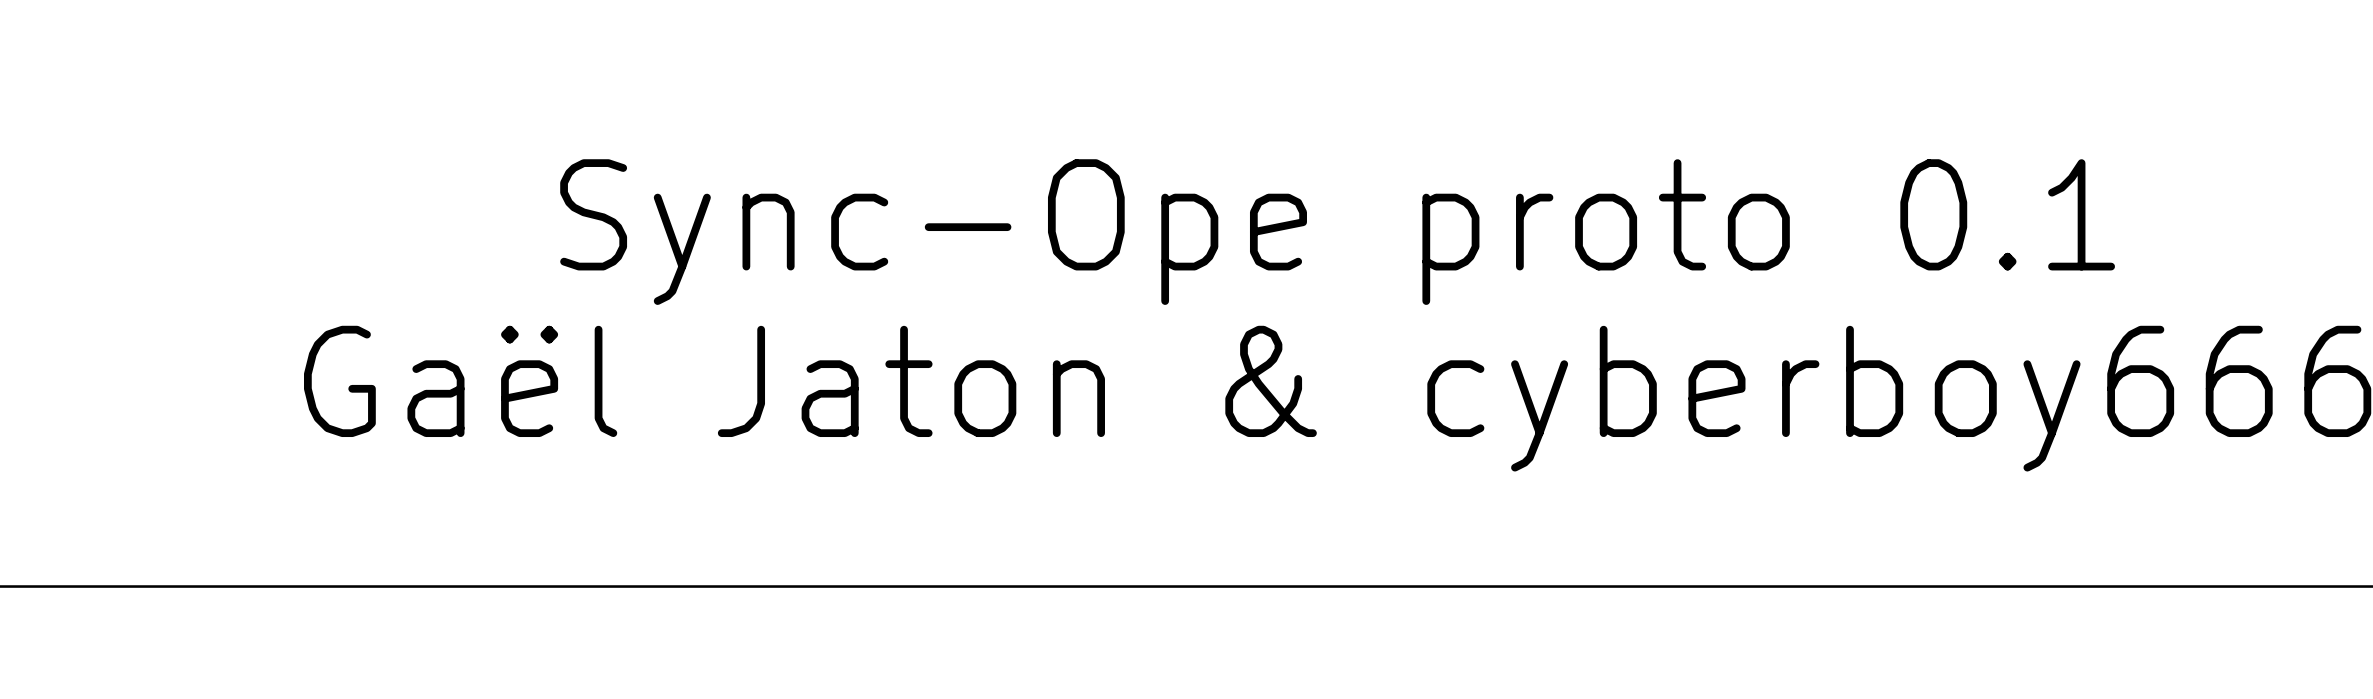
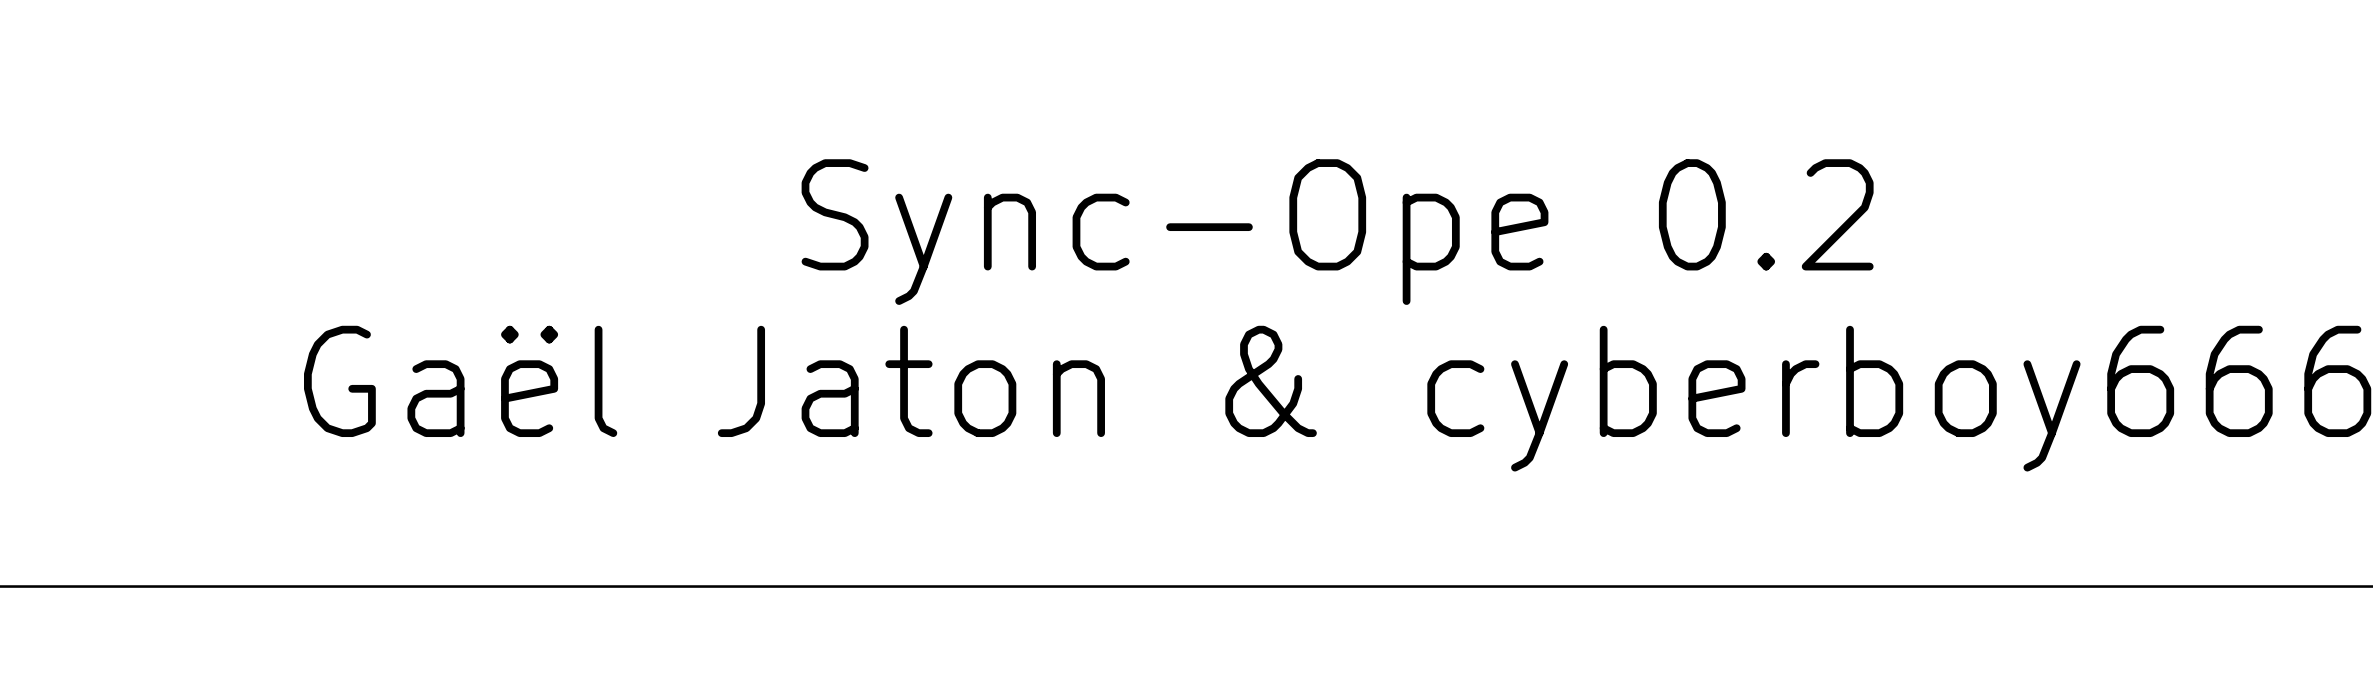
text: Sync-Ope proto 0.1 (1337, 232) -> Sync-Ope 0.2 (1337, 232)

